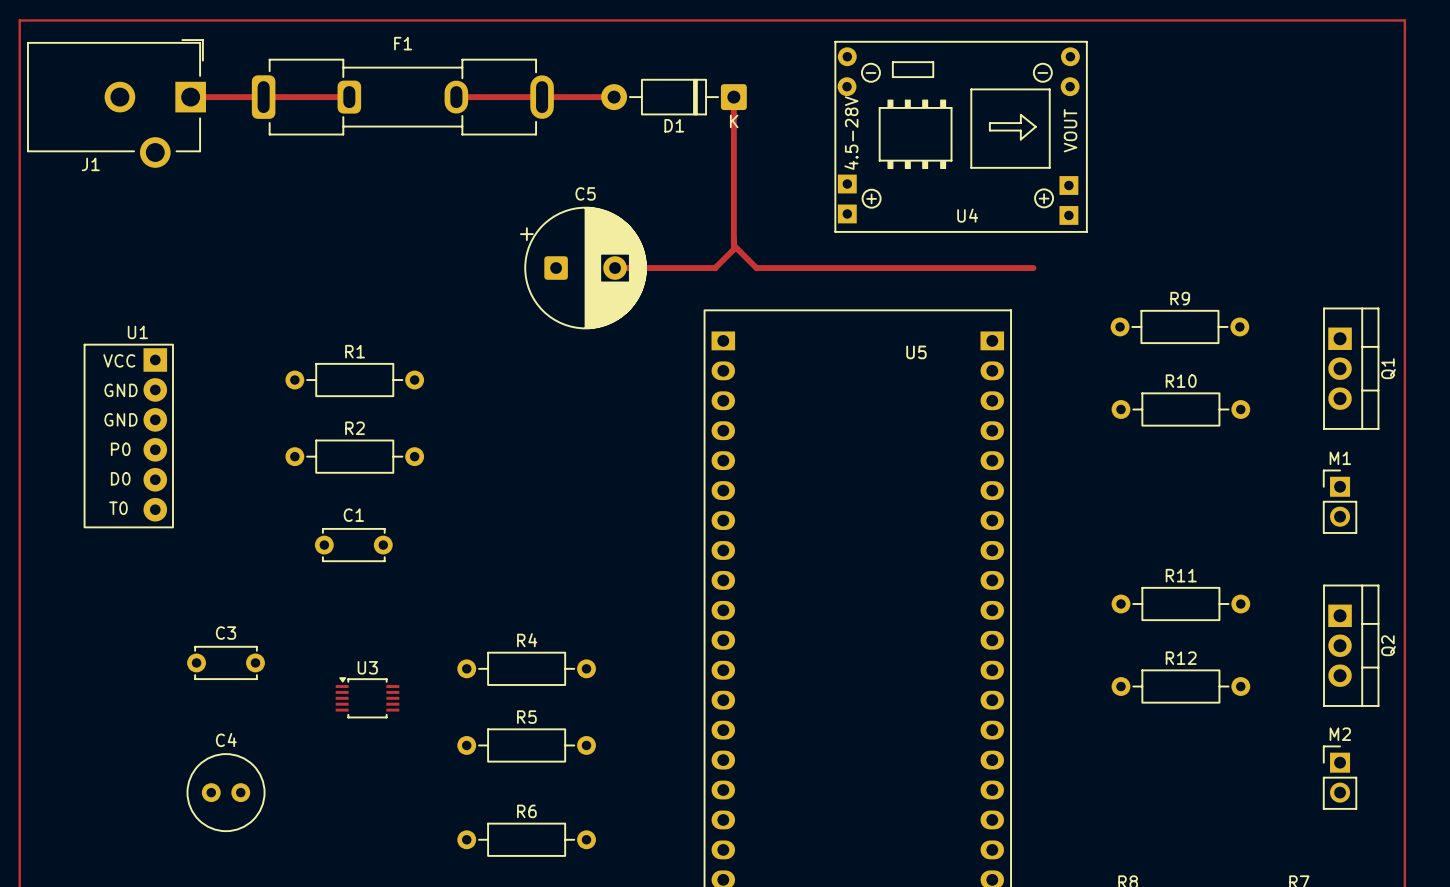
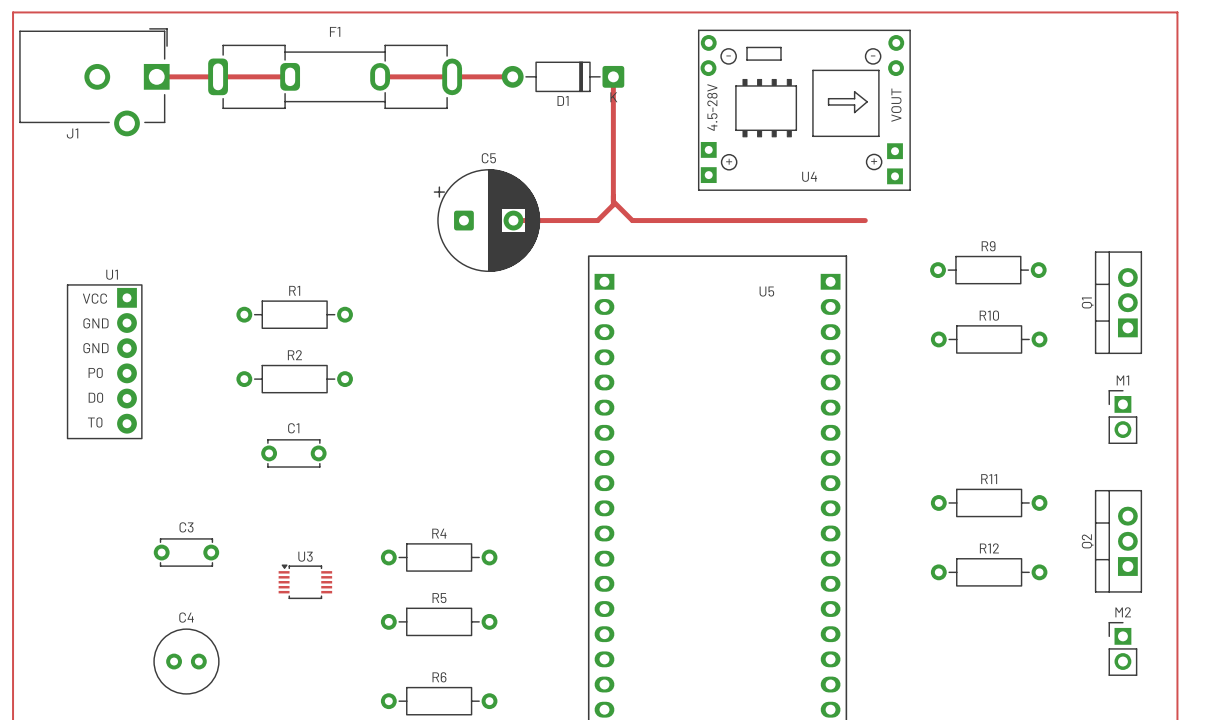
Q1 rotation: 0° (1351, 368) -> 180° (1118, 302)
Q2 rotation: 0° (1351, 645) -> 180° (1118, 541)

